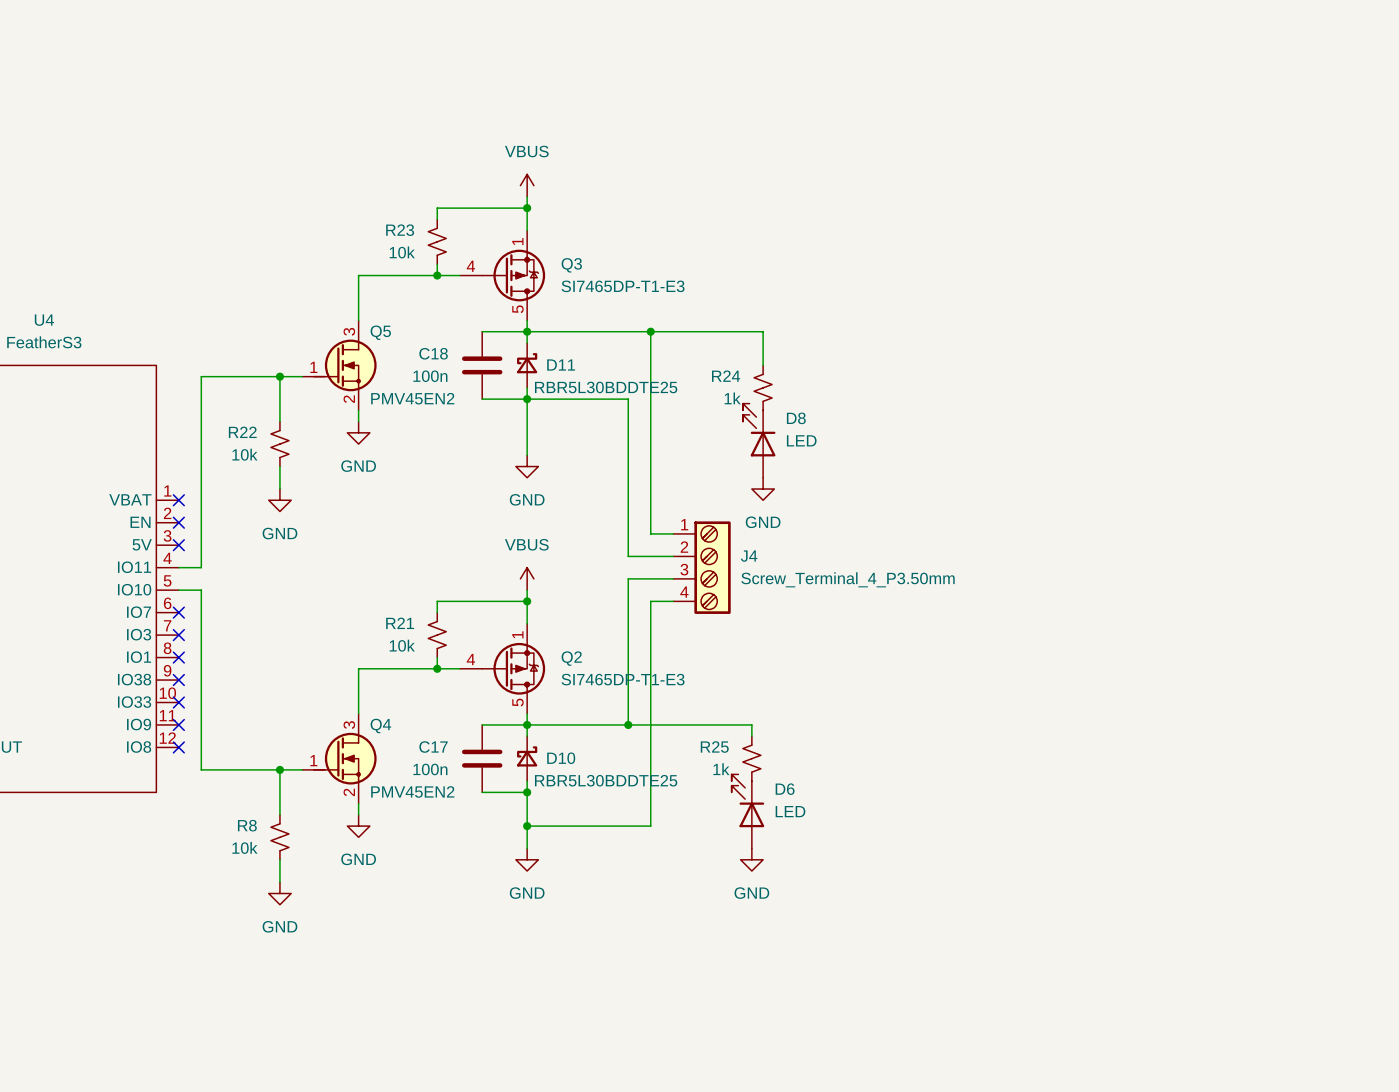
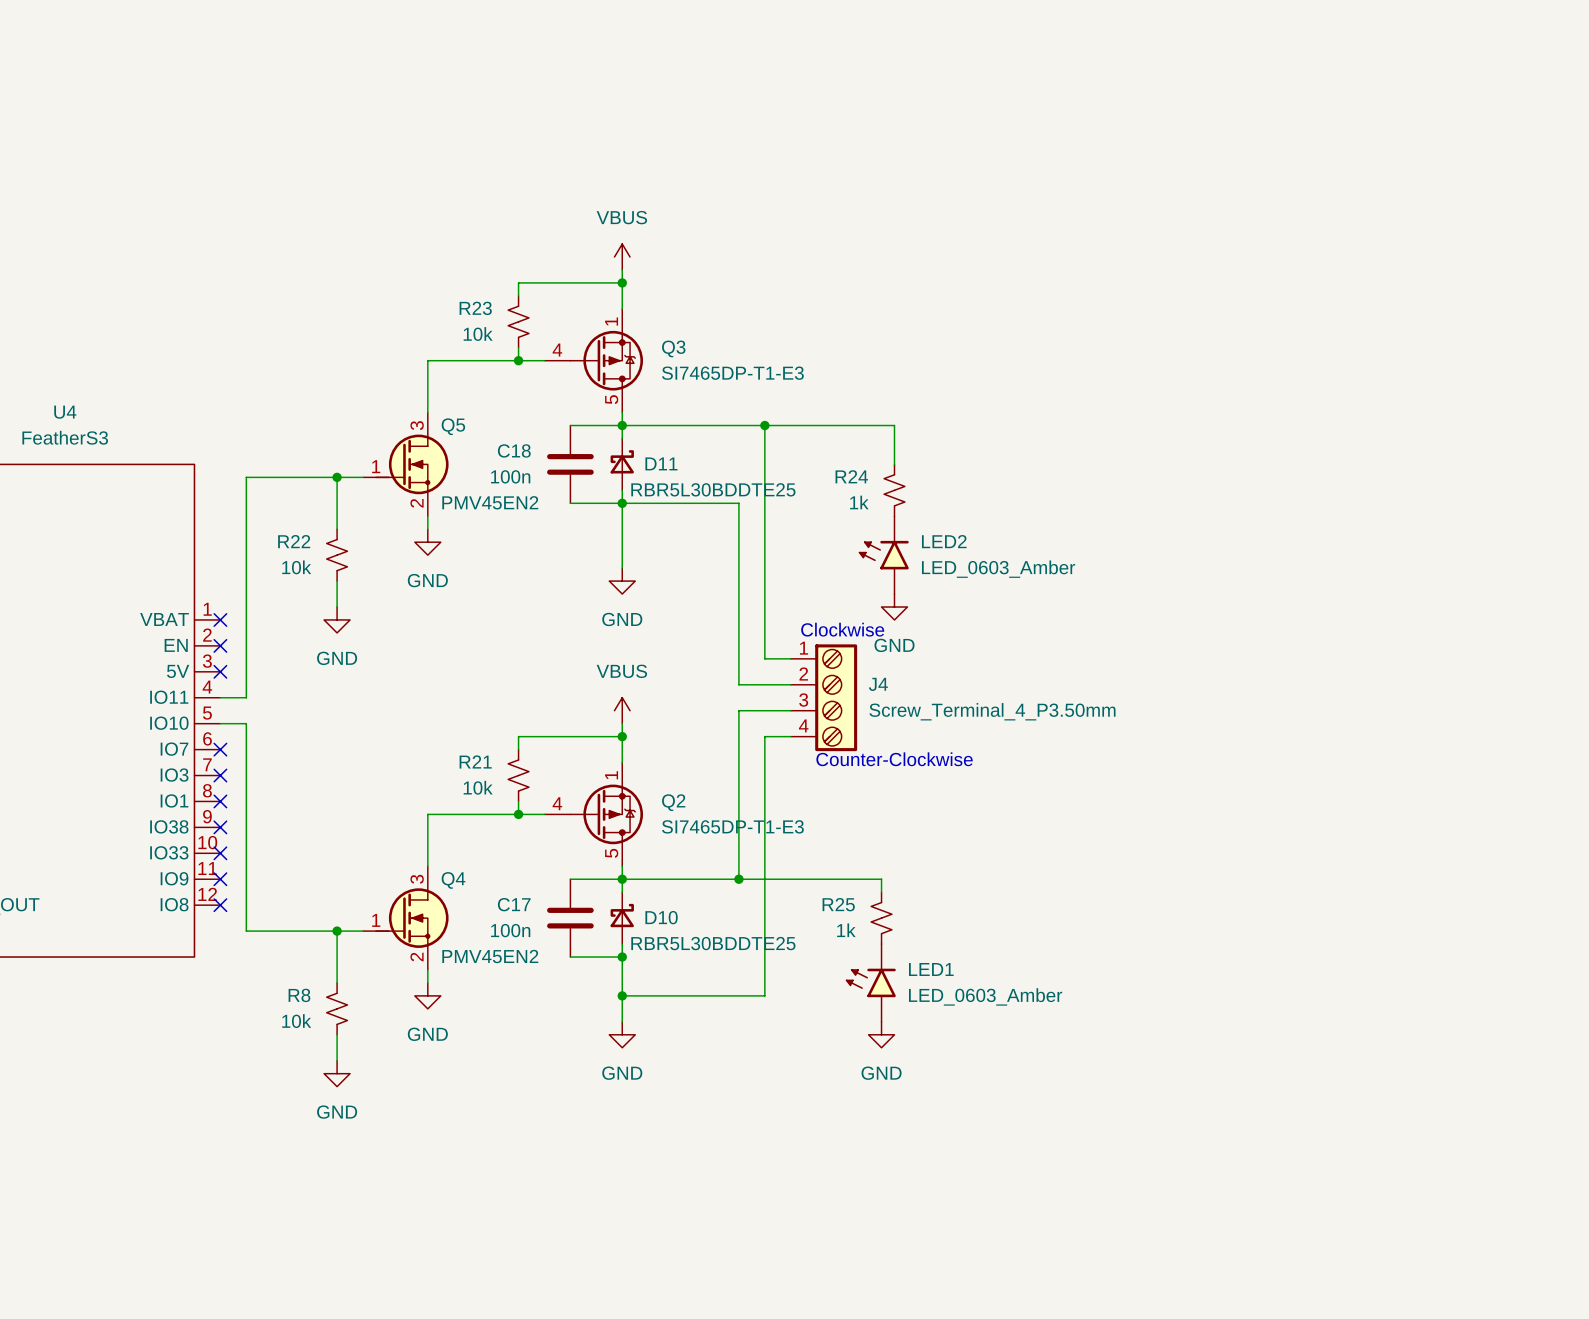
D8: LED (759, 440) -> none
LED2: none -> LED_0603_Amber (883, 555)
text: none -> Clockwise (842, 629)
text: none -> Counter-Clockwise (894, 759)
D6: LED (747, 811) -> none
LED1: none -> LED_0603_Amber (870, 982)

